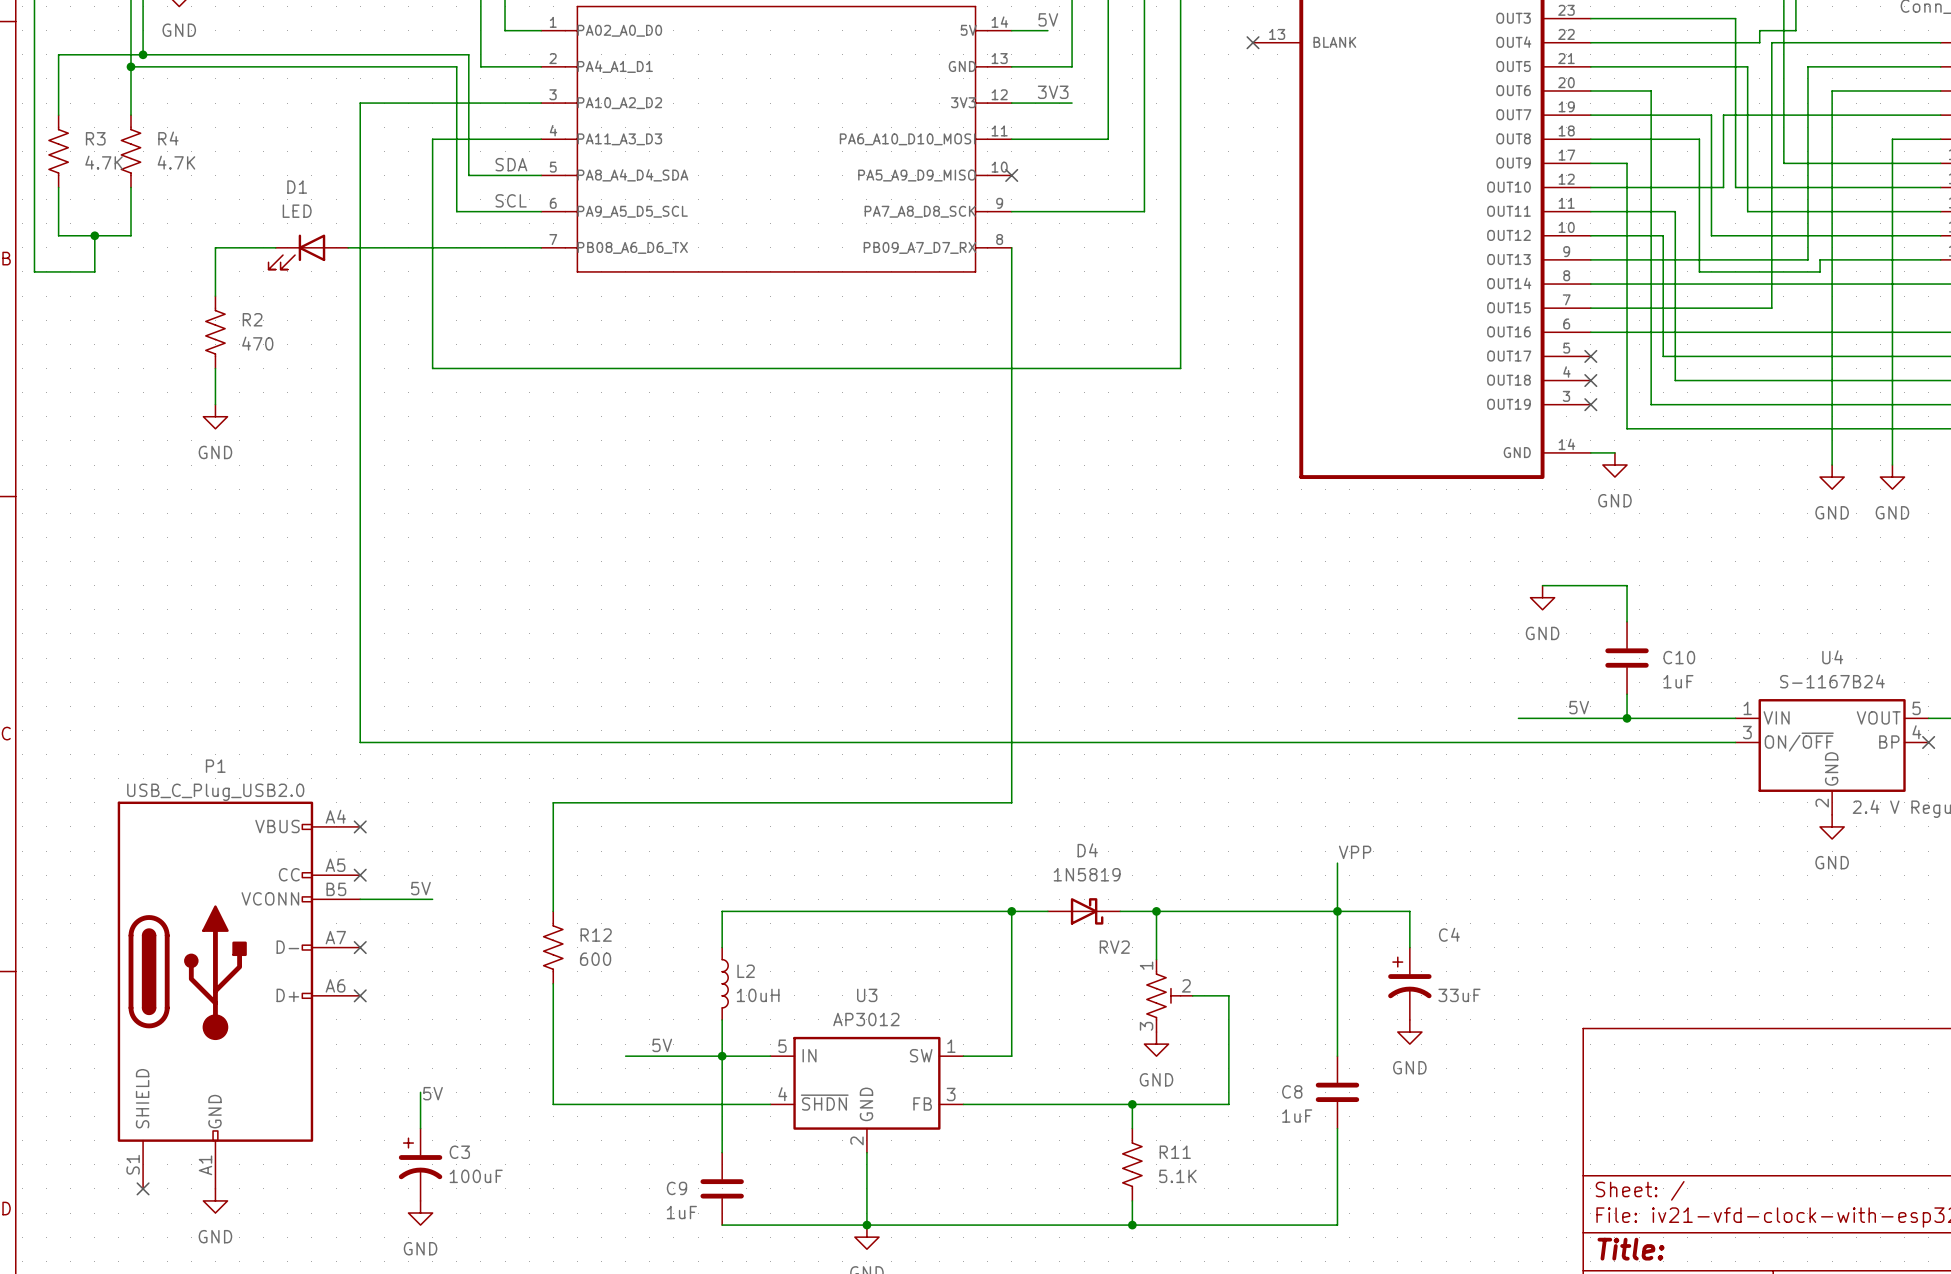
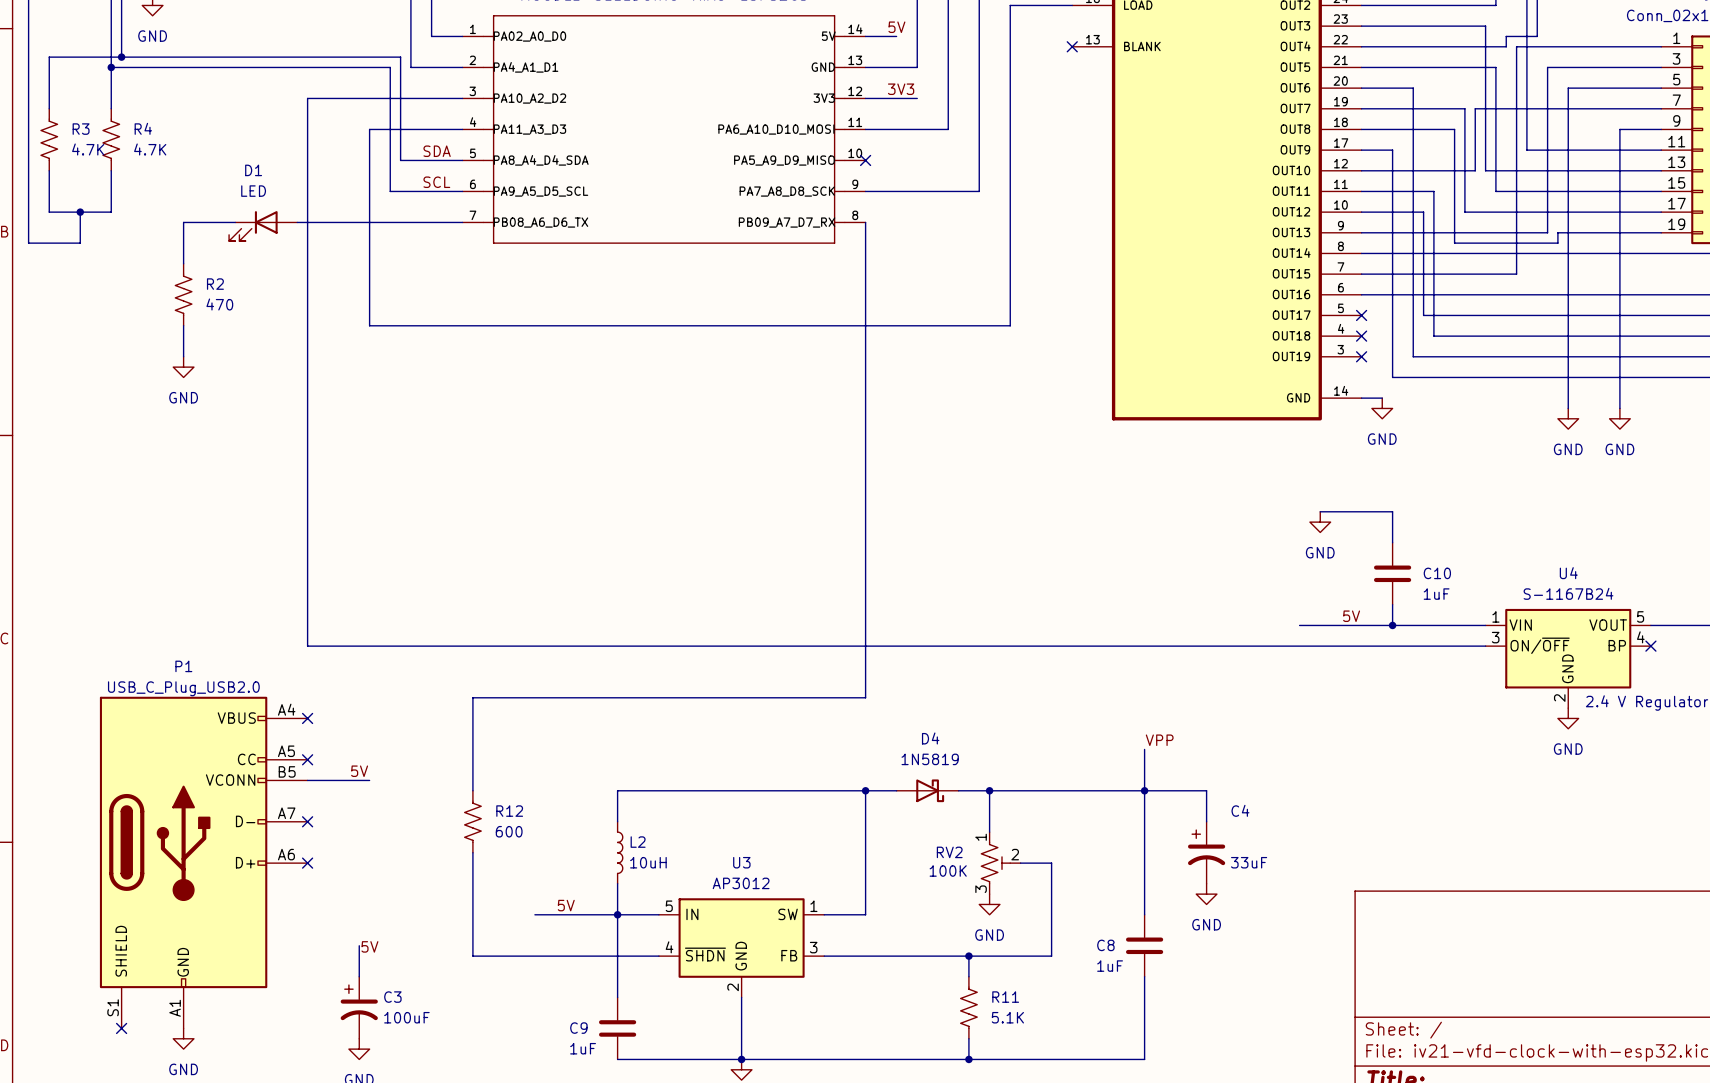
RV2 name position: RV2 (1114, 947) -> RV2 (949, 852)
RV2 value: none -> 100K (948, 871)

